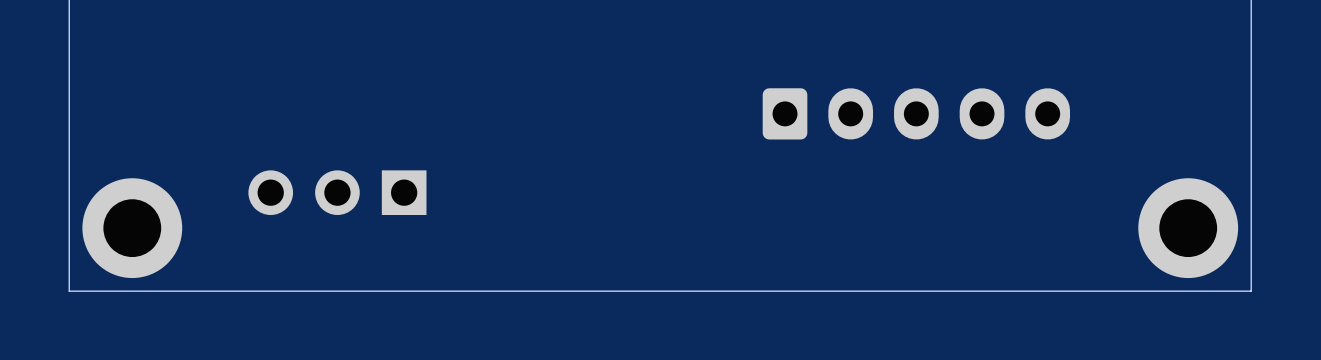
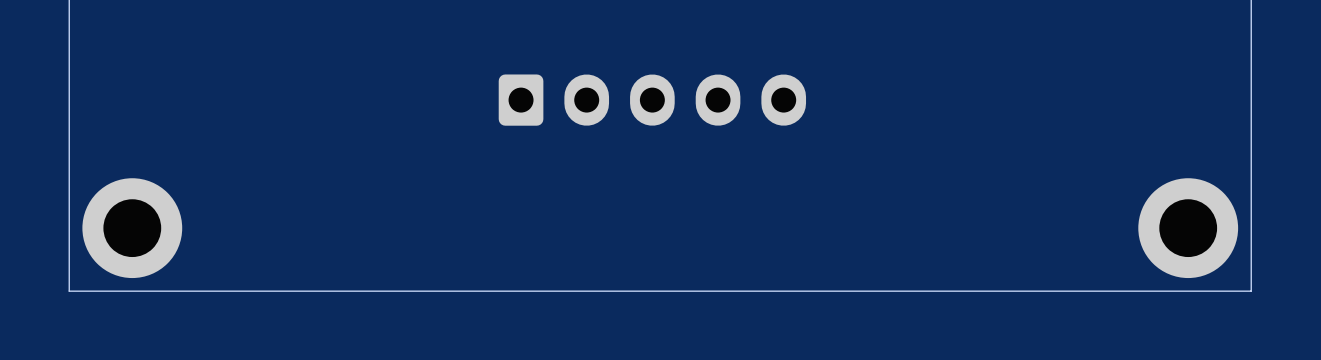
part position: (916, 113) -> (652, 100)
part: (337, 192) -> none

